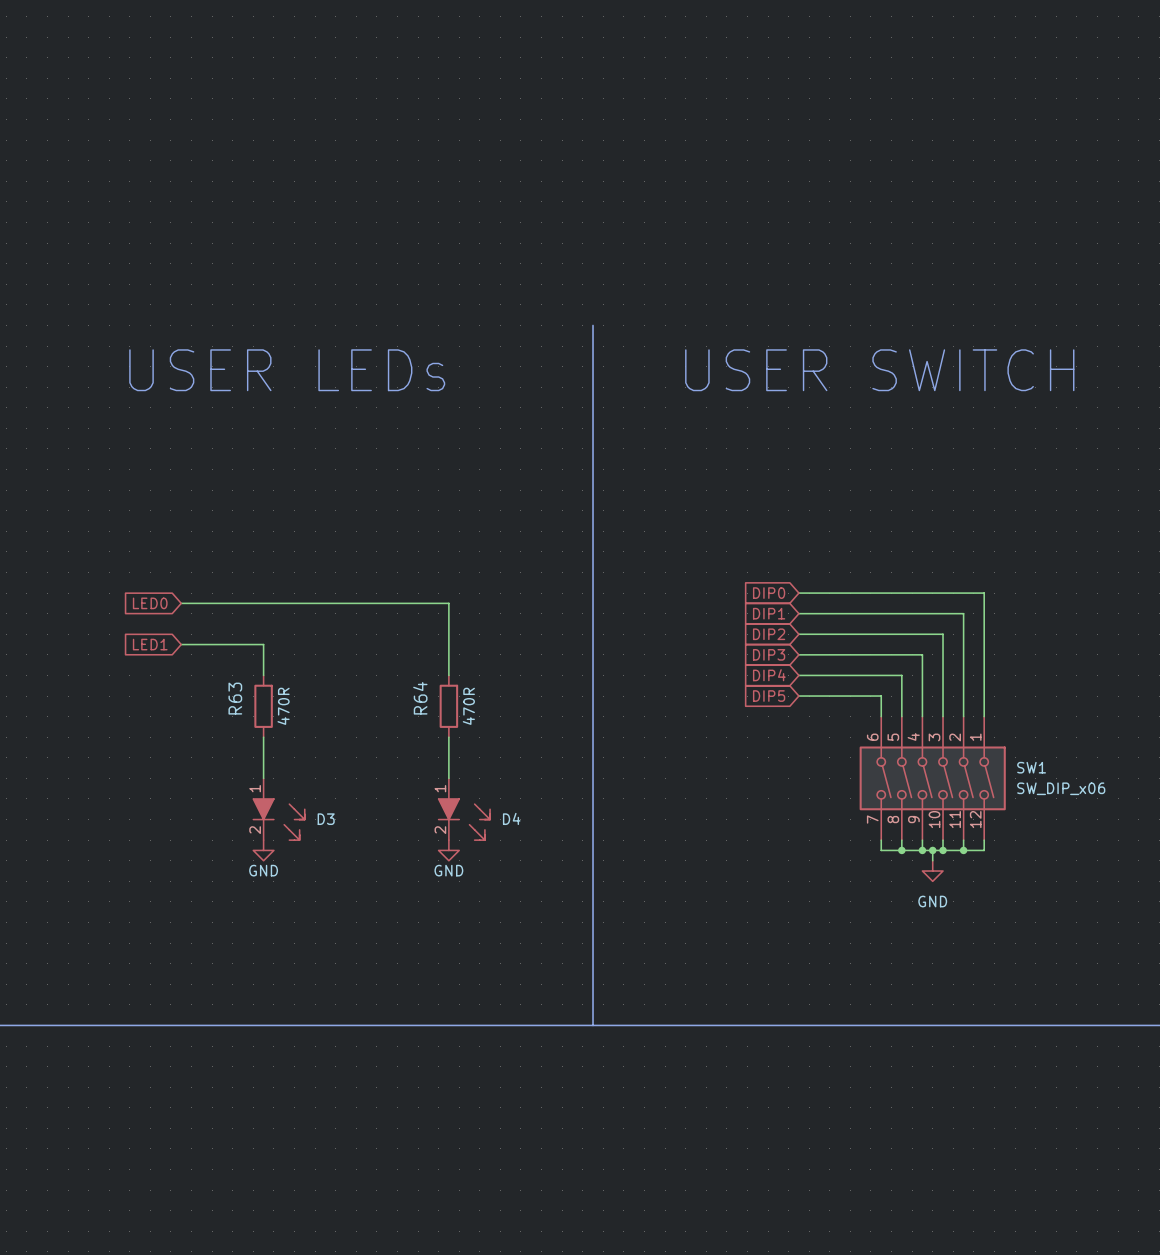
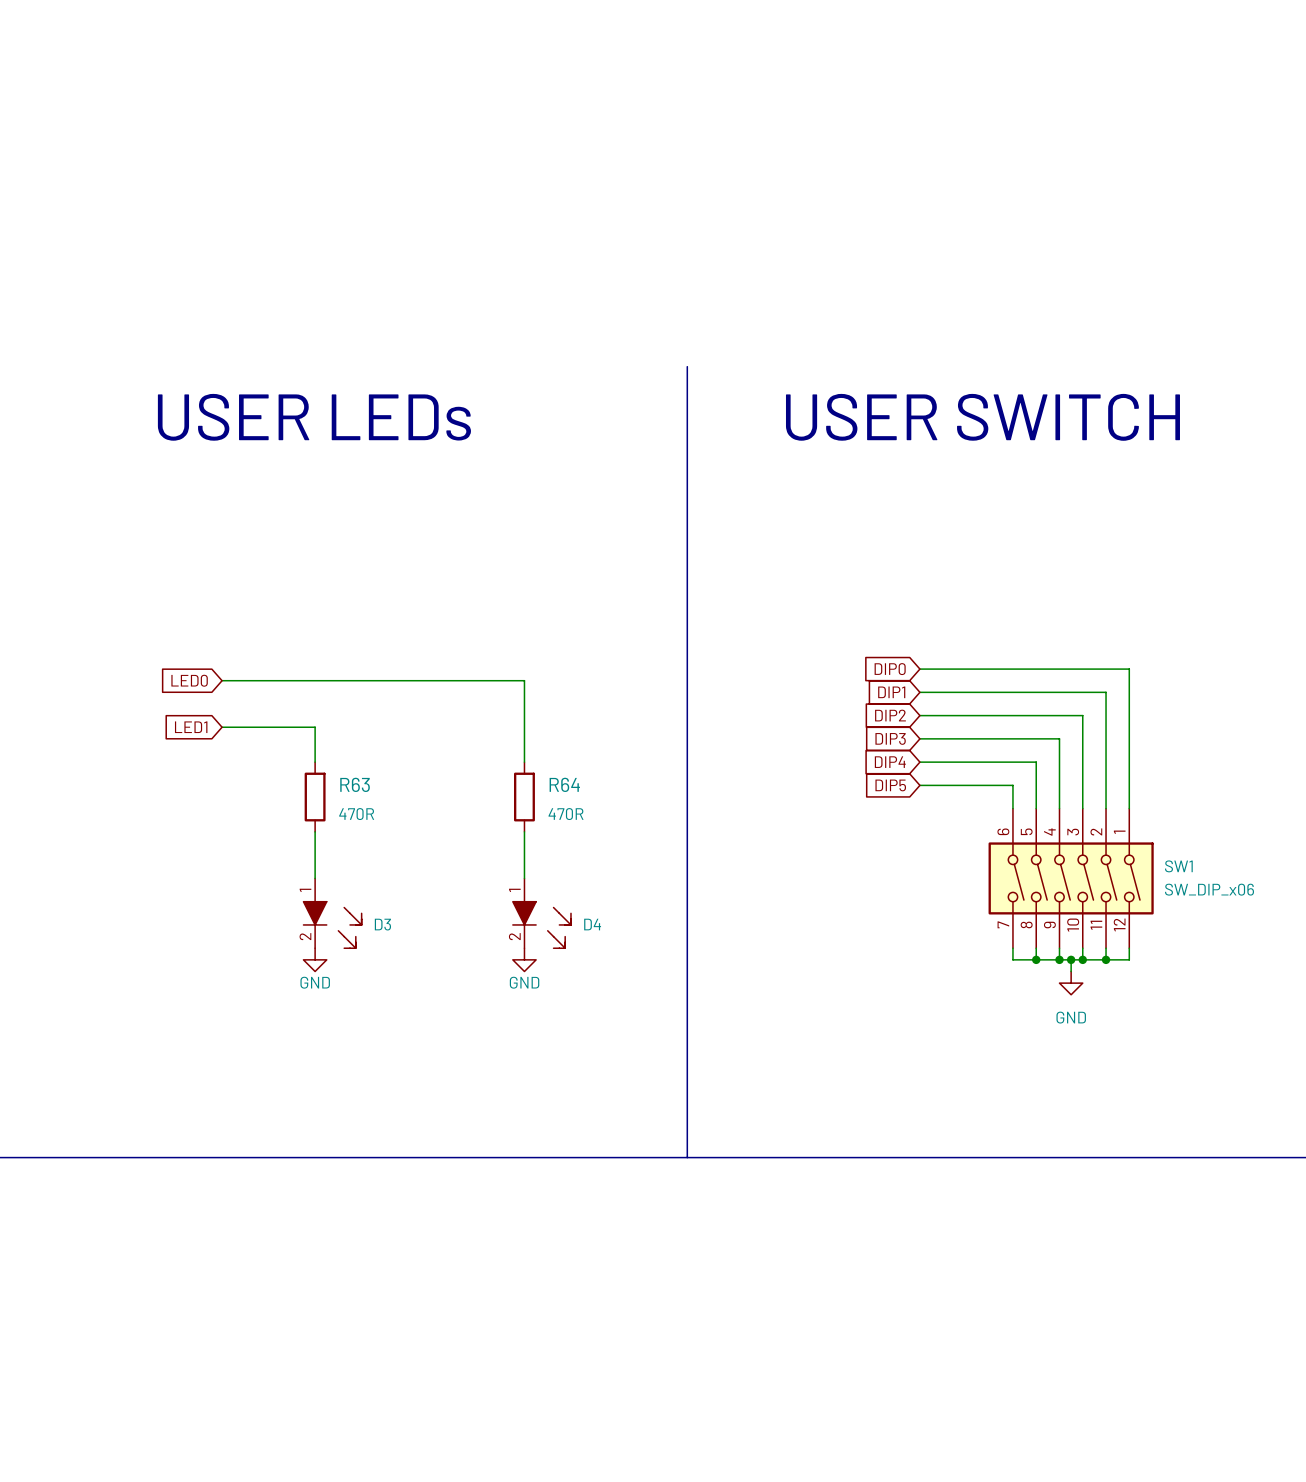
R63 name rotation: 0° (235, 698) -> 90° clockwise (355, 784)
R63 name position: R63 (235, 698) -> R63 (355, 784)
R64 name rotation: 0° (420, 698) -> 90° clockwise (564, 784)
R64 name position: R64 (420, 698) -> R64 (564, 784)
R63 text rotation: 0° (283, 706) -> 90° clockwise (356, 814)
R64 text rotation: 0° (468, 706) -> 90° clockwise (566, 814)

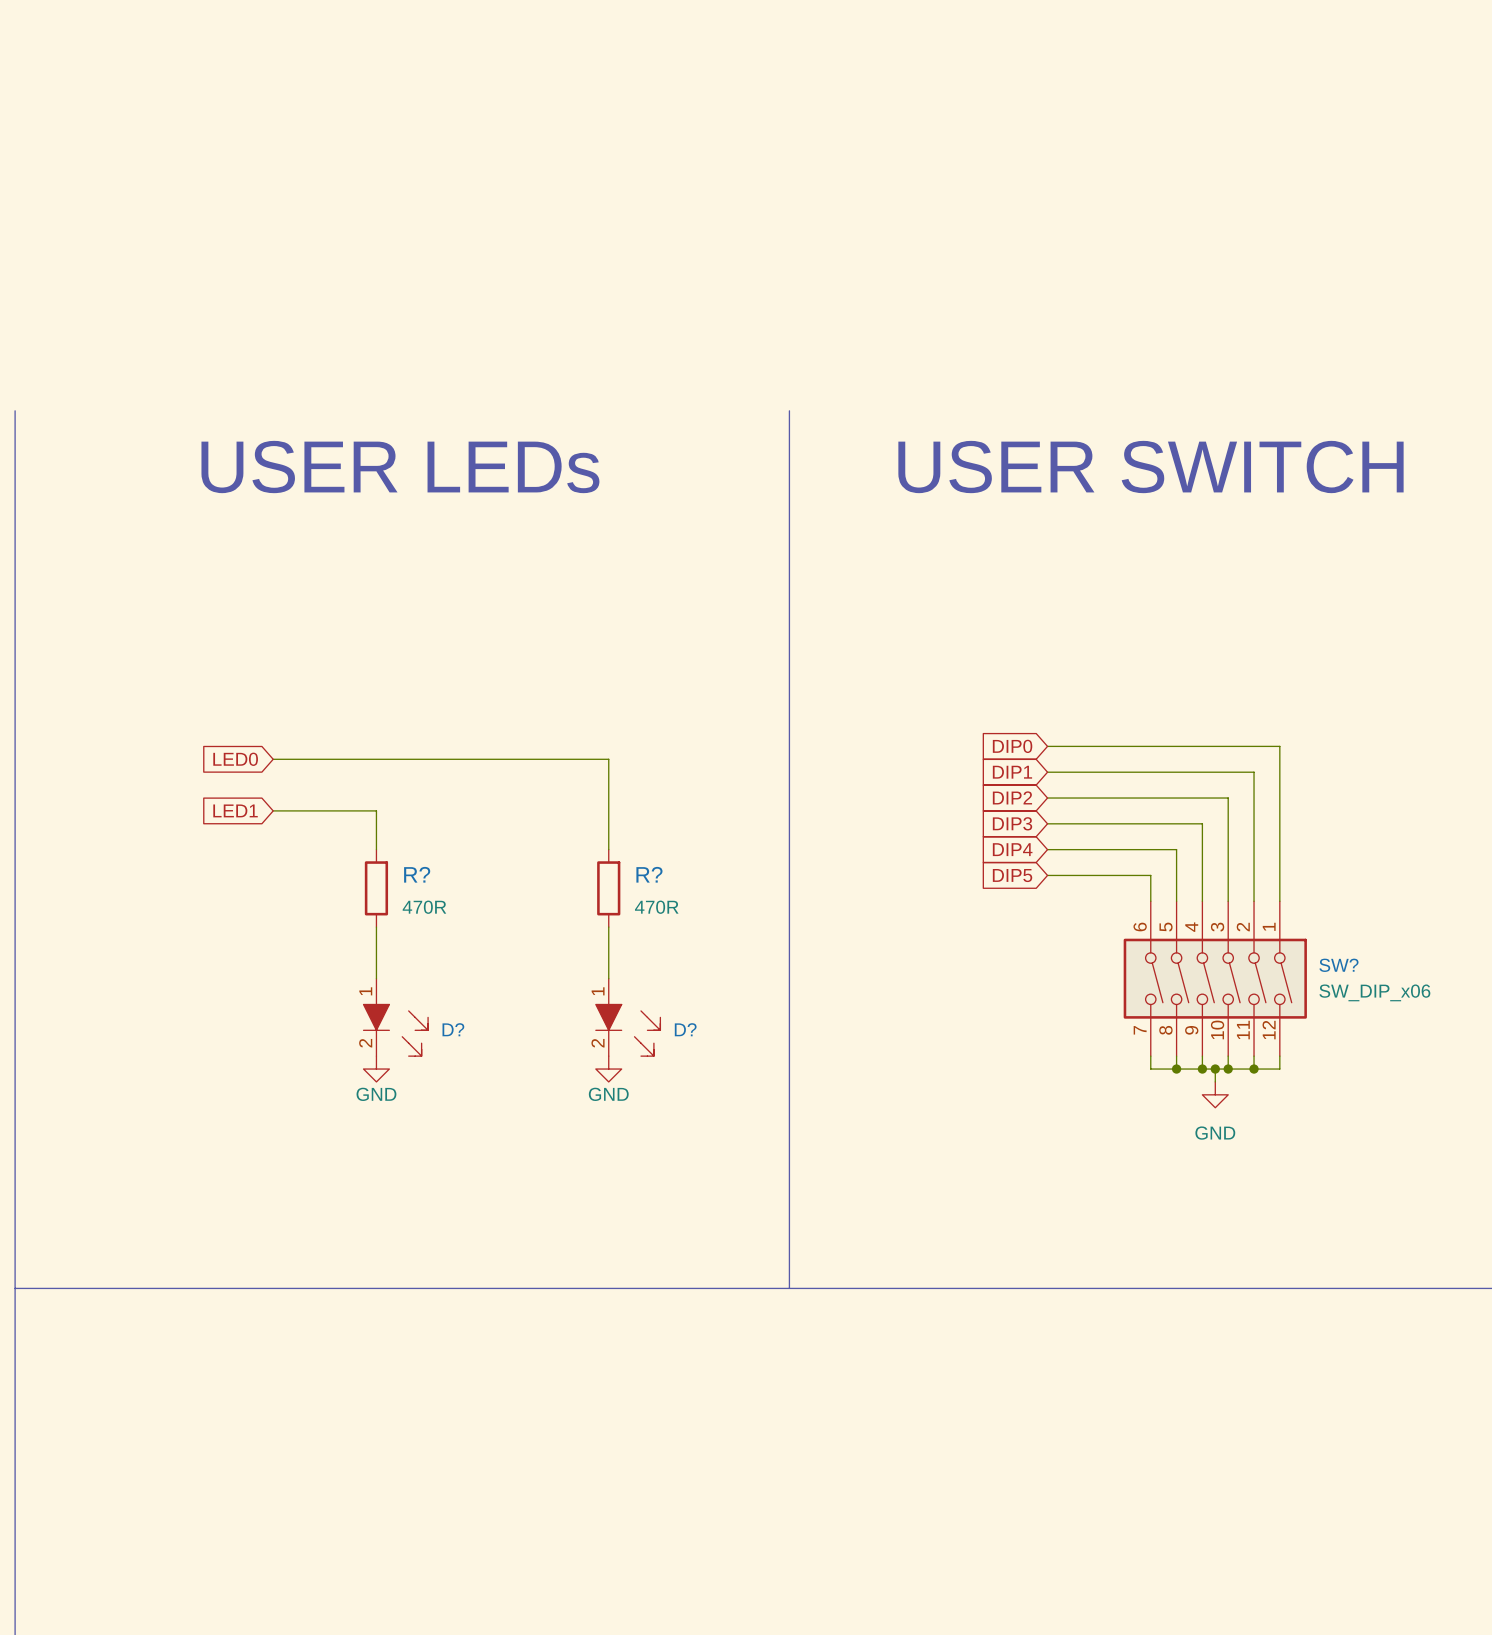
R63 name: R63 (355, 784) -> R? (417, 874)
R64 name: R64 (564, 784) -> R? (649, 874)
SW1 name: SW1 (1178, 866) -> SW? (1338, 965)
D3 name: D3 (382, 924) -> D? (453, 1029)
D4 name: D4 (592, 924) -> D? (685, 1029)

